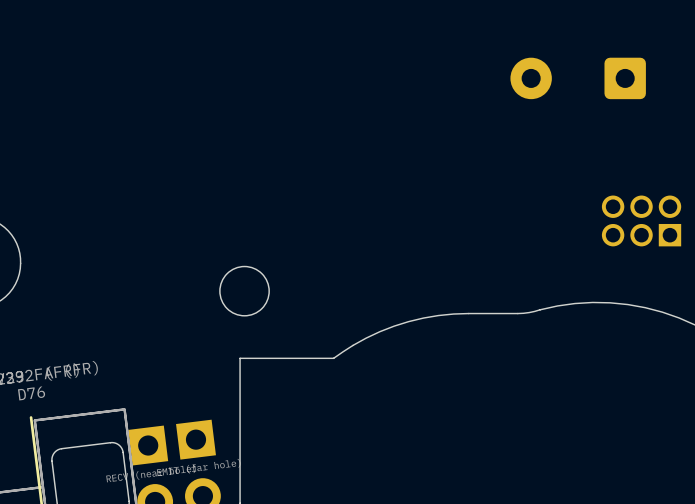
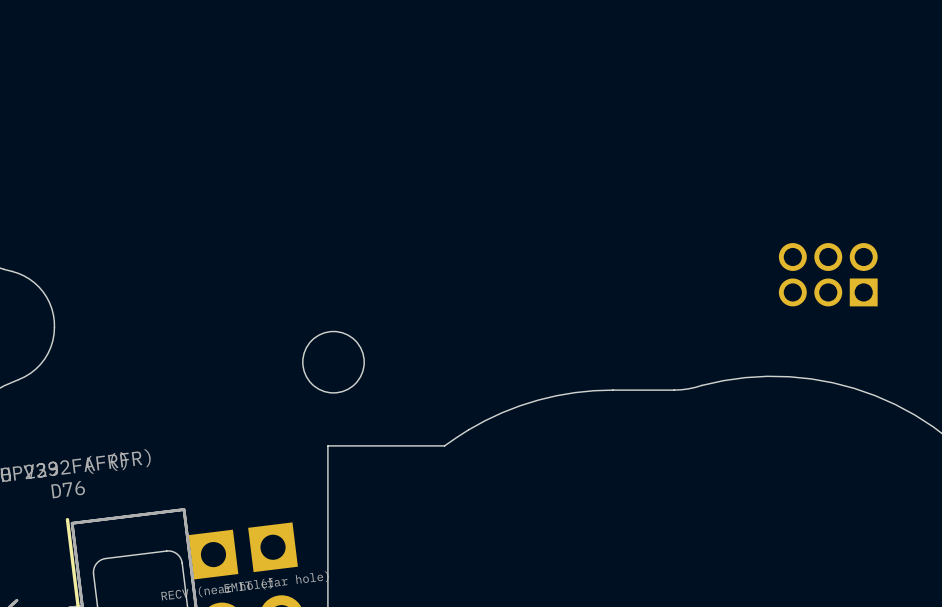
part: (578, 78) -> none

